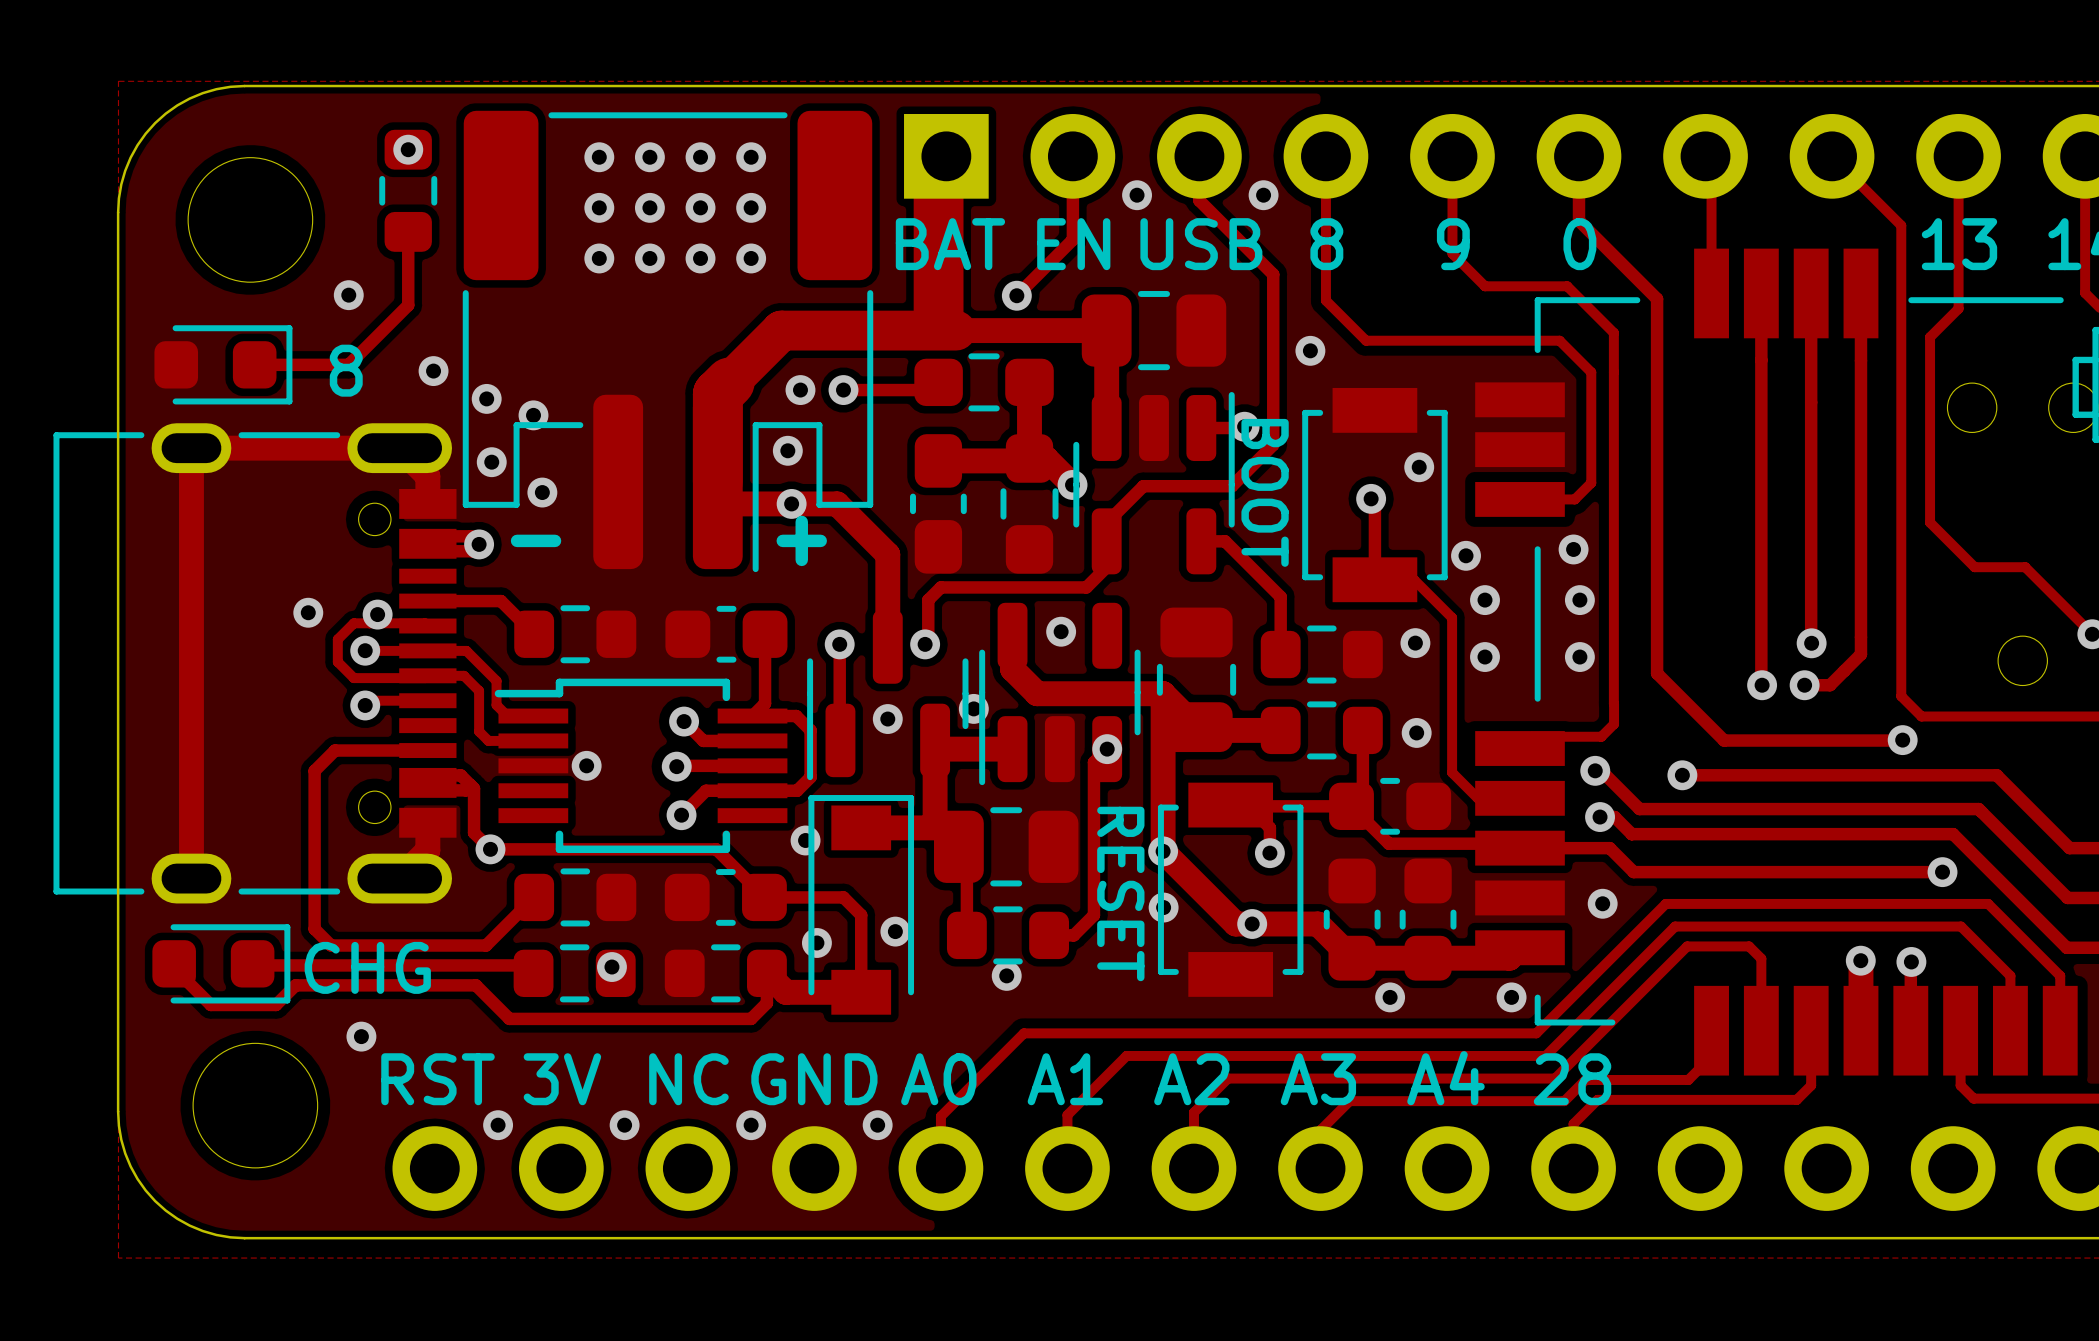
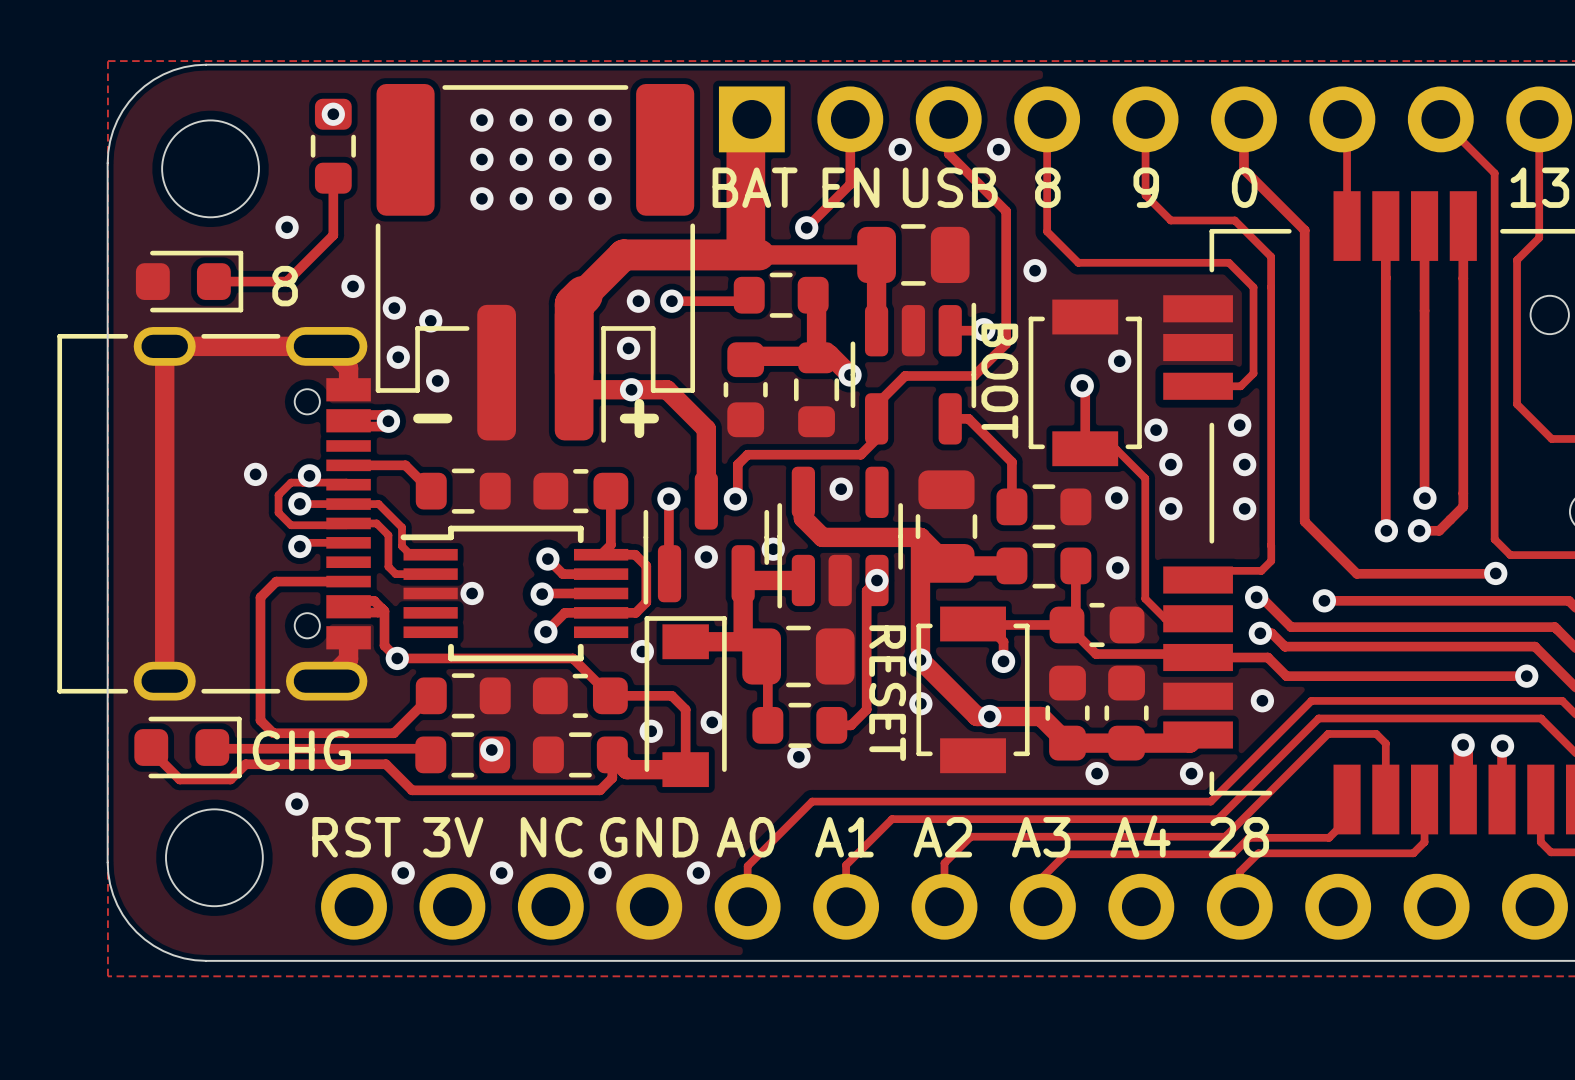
part footprint: [914, 353, 1054, 412] -> [733, 272, 829, 318]
part footprint: [910, 434, 967, 574] -> [723, 342, 768, 438]
part footprint: [1000, 434, 1059, 574] -> [793, 342, 840, 438]

